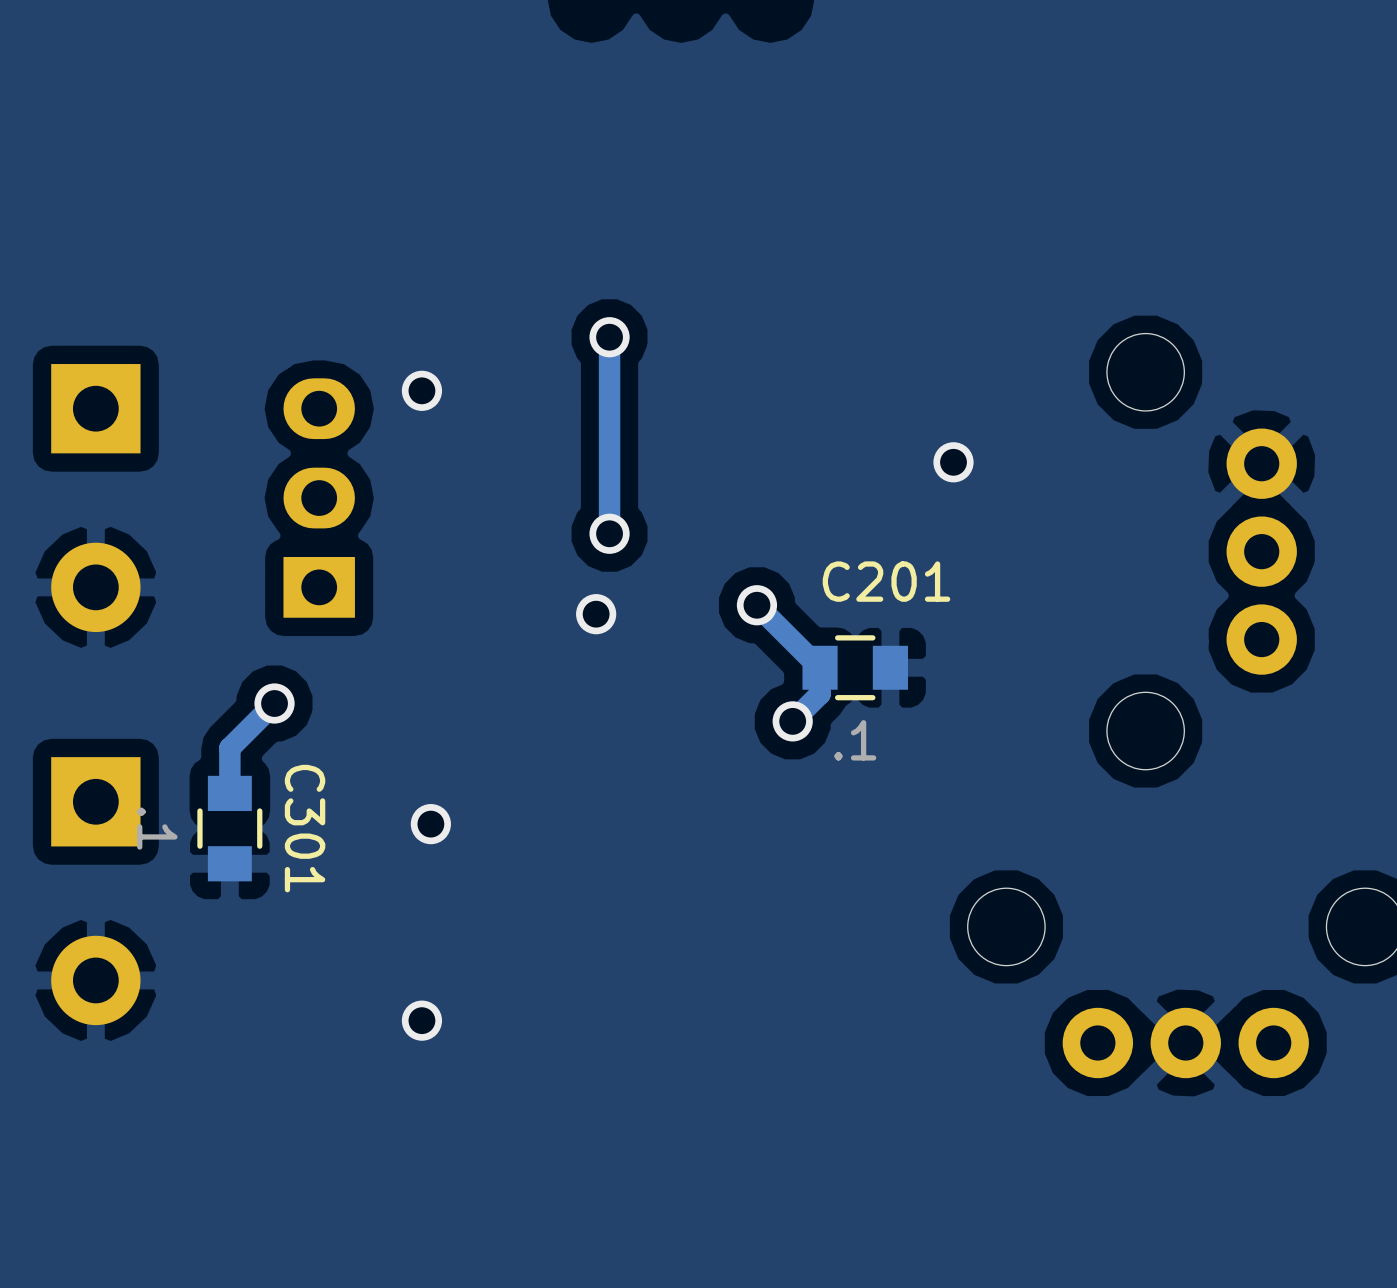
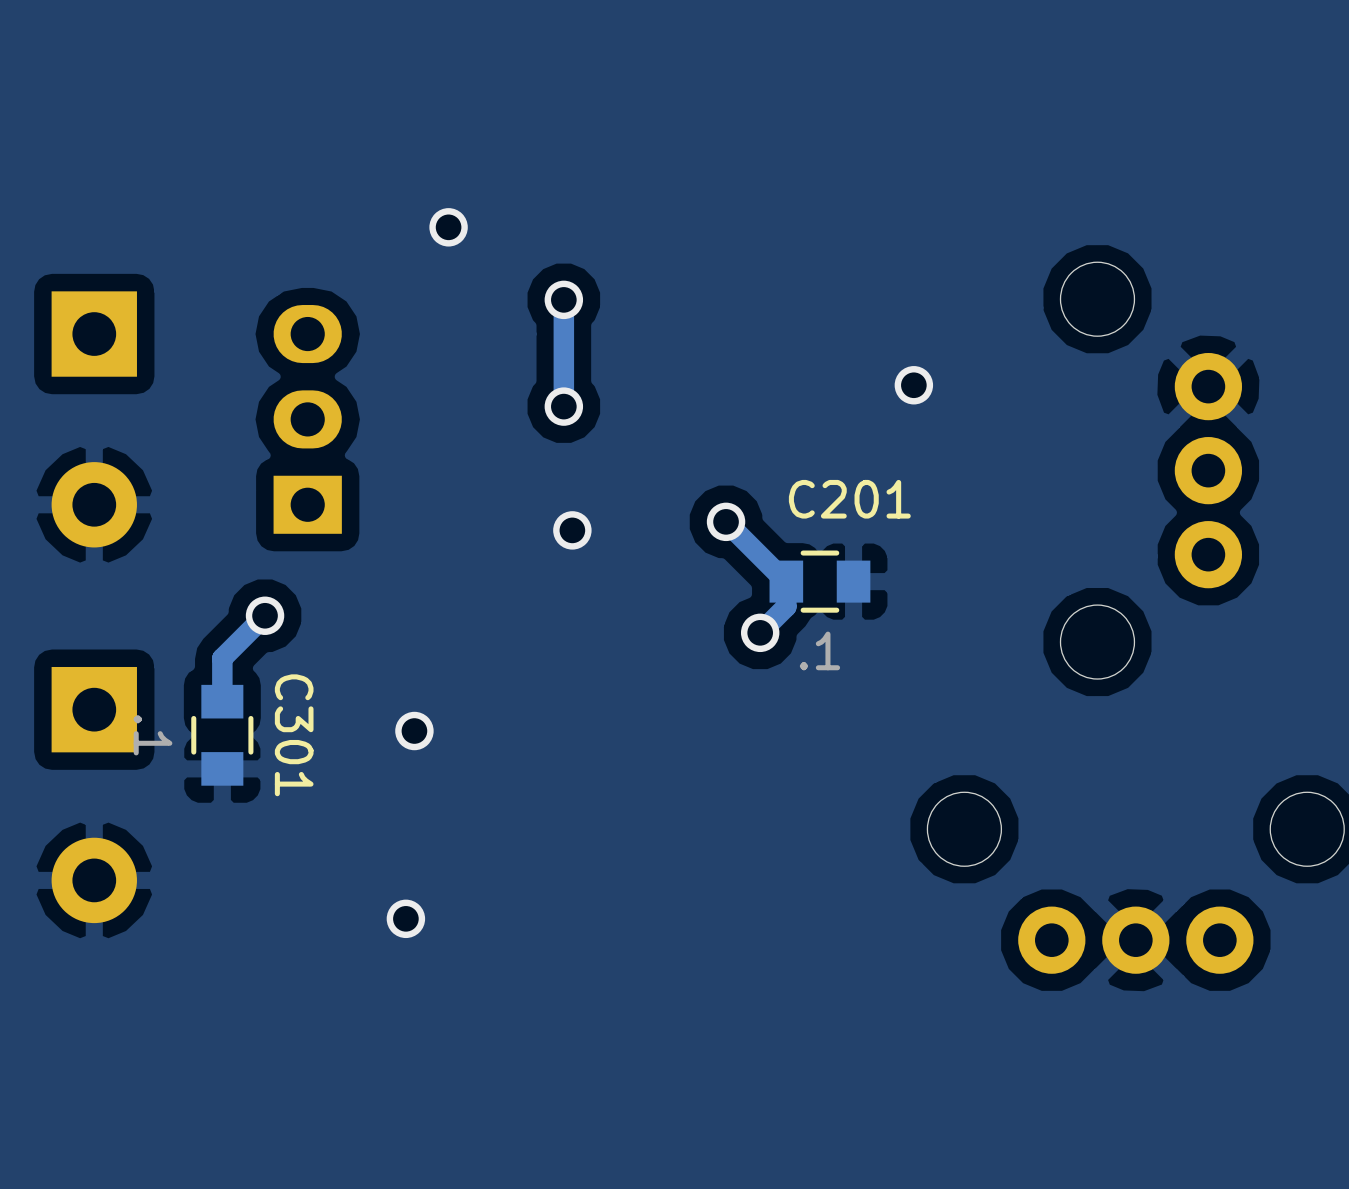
via: none -> (448, 227)
track: (609, 337) (609, 533) -> none
via position: (609, 337) -> (563, 299)
track: none -> (563, 299) (563, 406)
via: (421, 390) -> none
via position: (609, 533) -> (563, 406)

